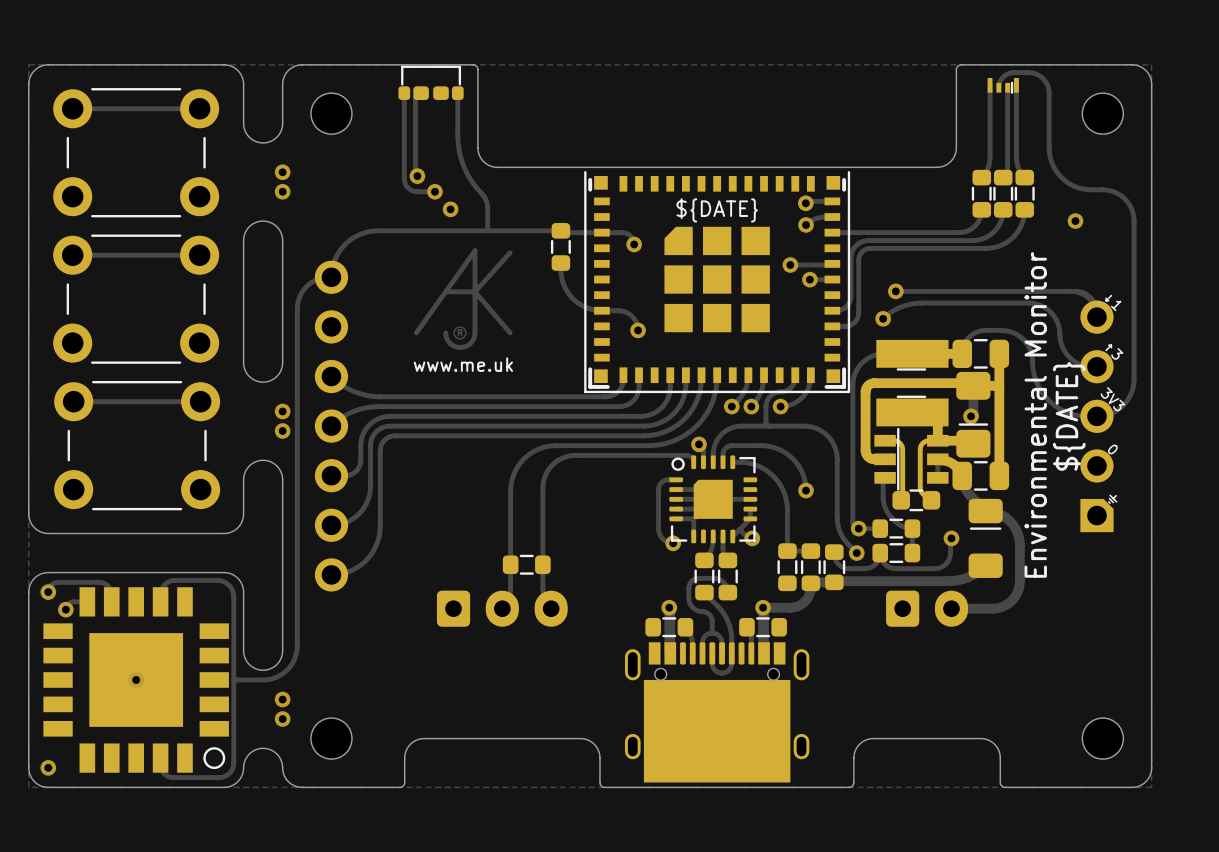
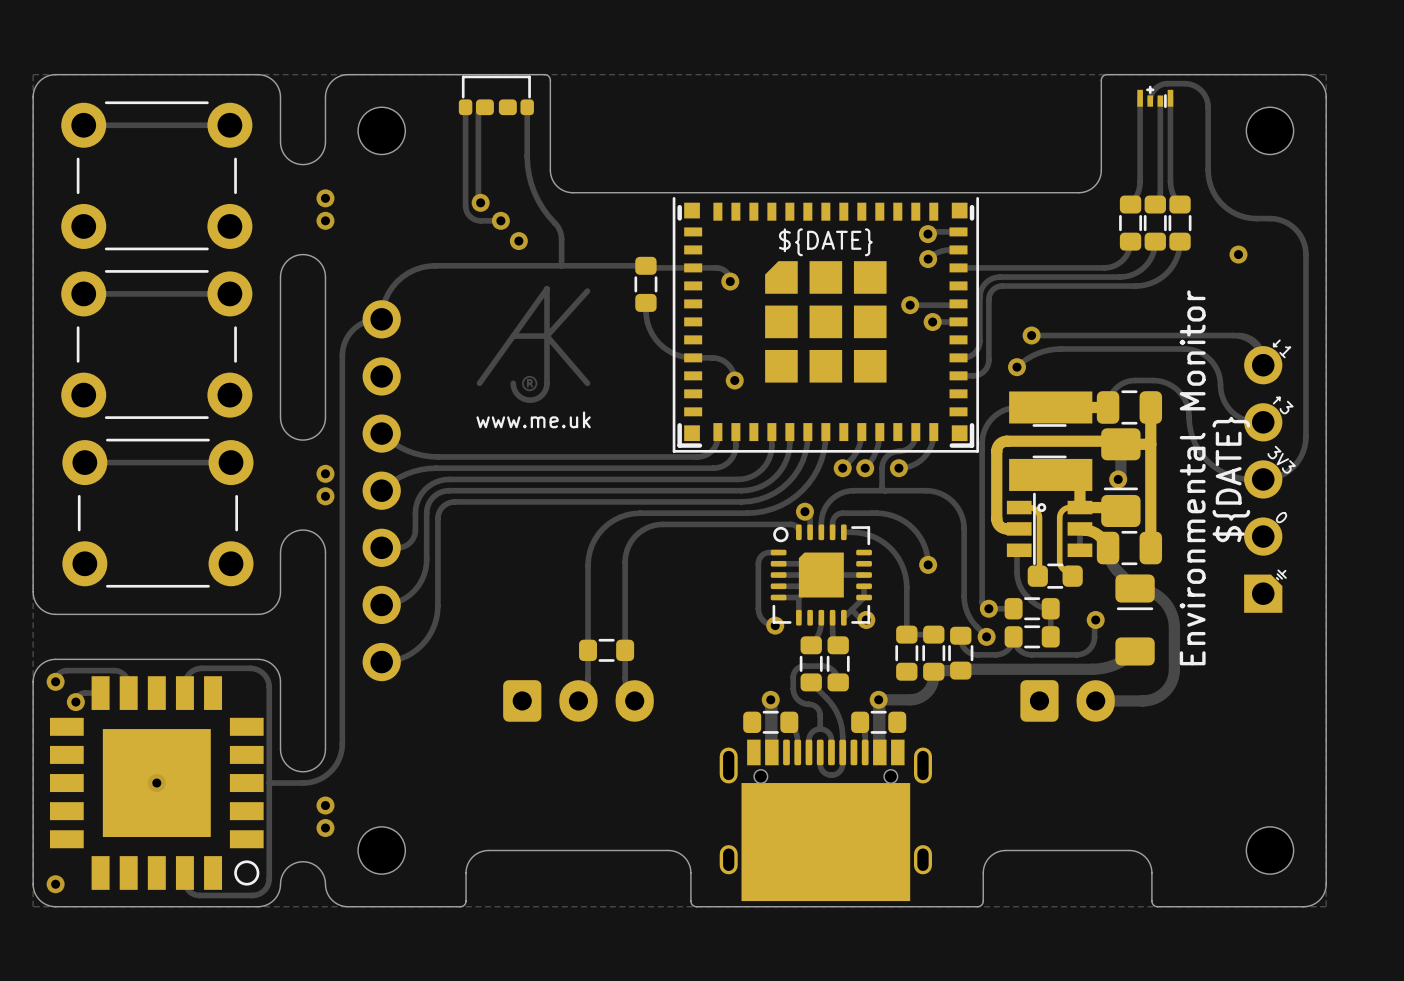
part footprint: [987, 78, 1019, 94] -> [1137, 85, 1174, 109]
part footprint: [860, 339, 1010, 510] -> [991, 391, 1163, 587]

